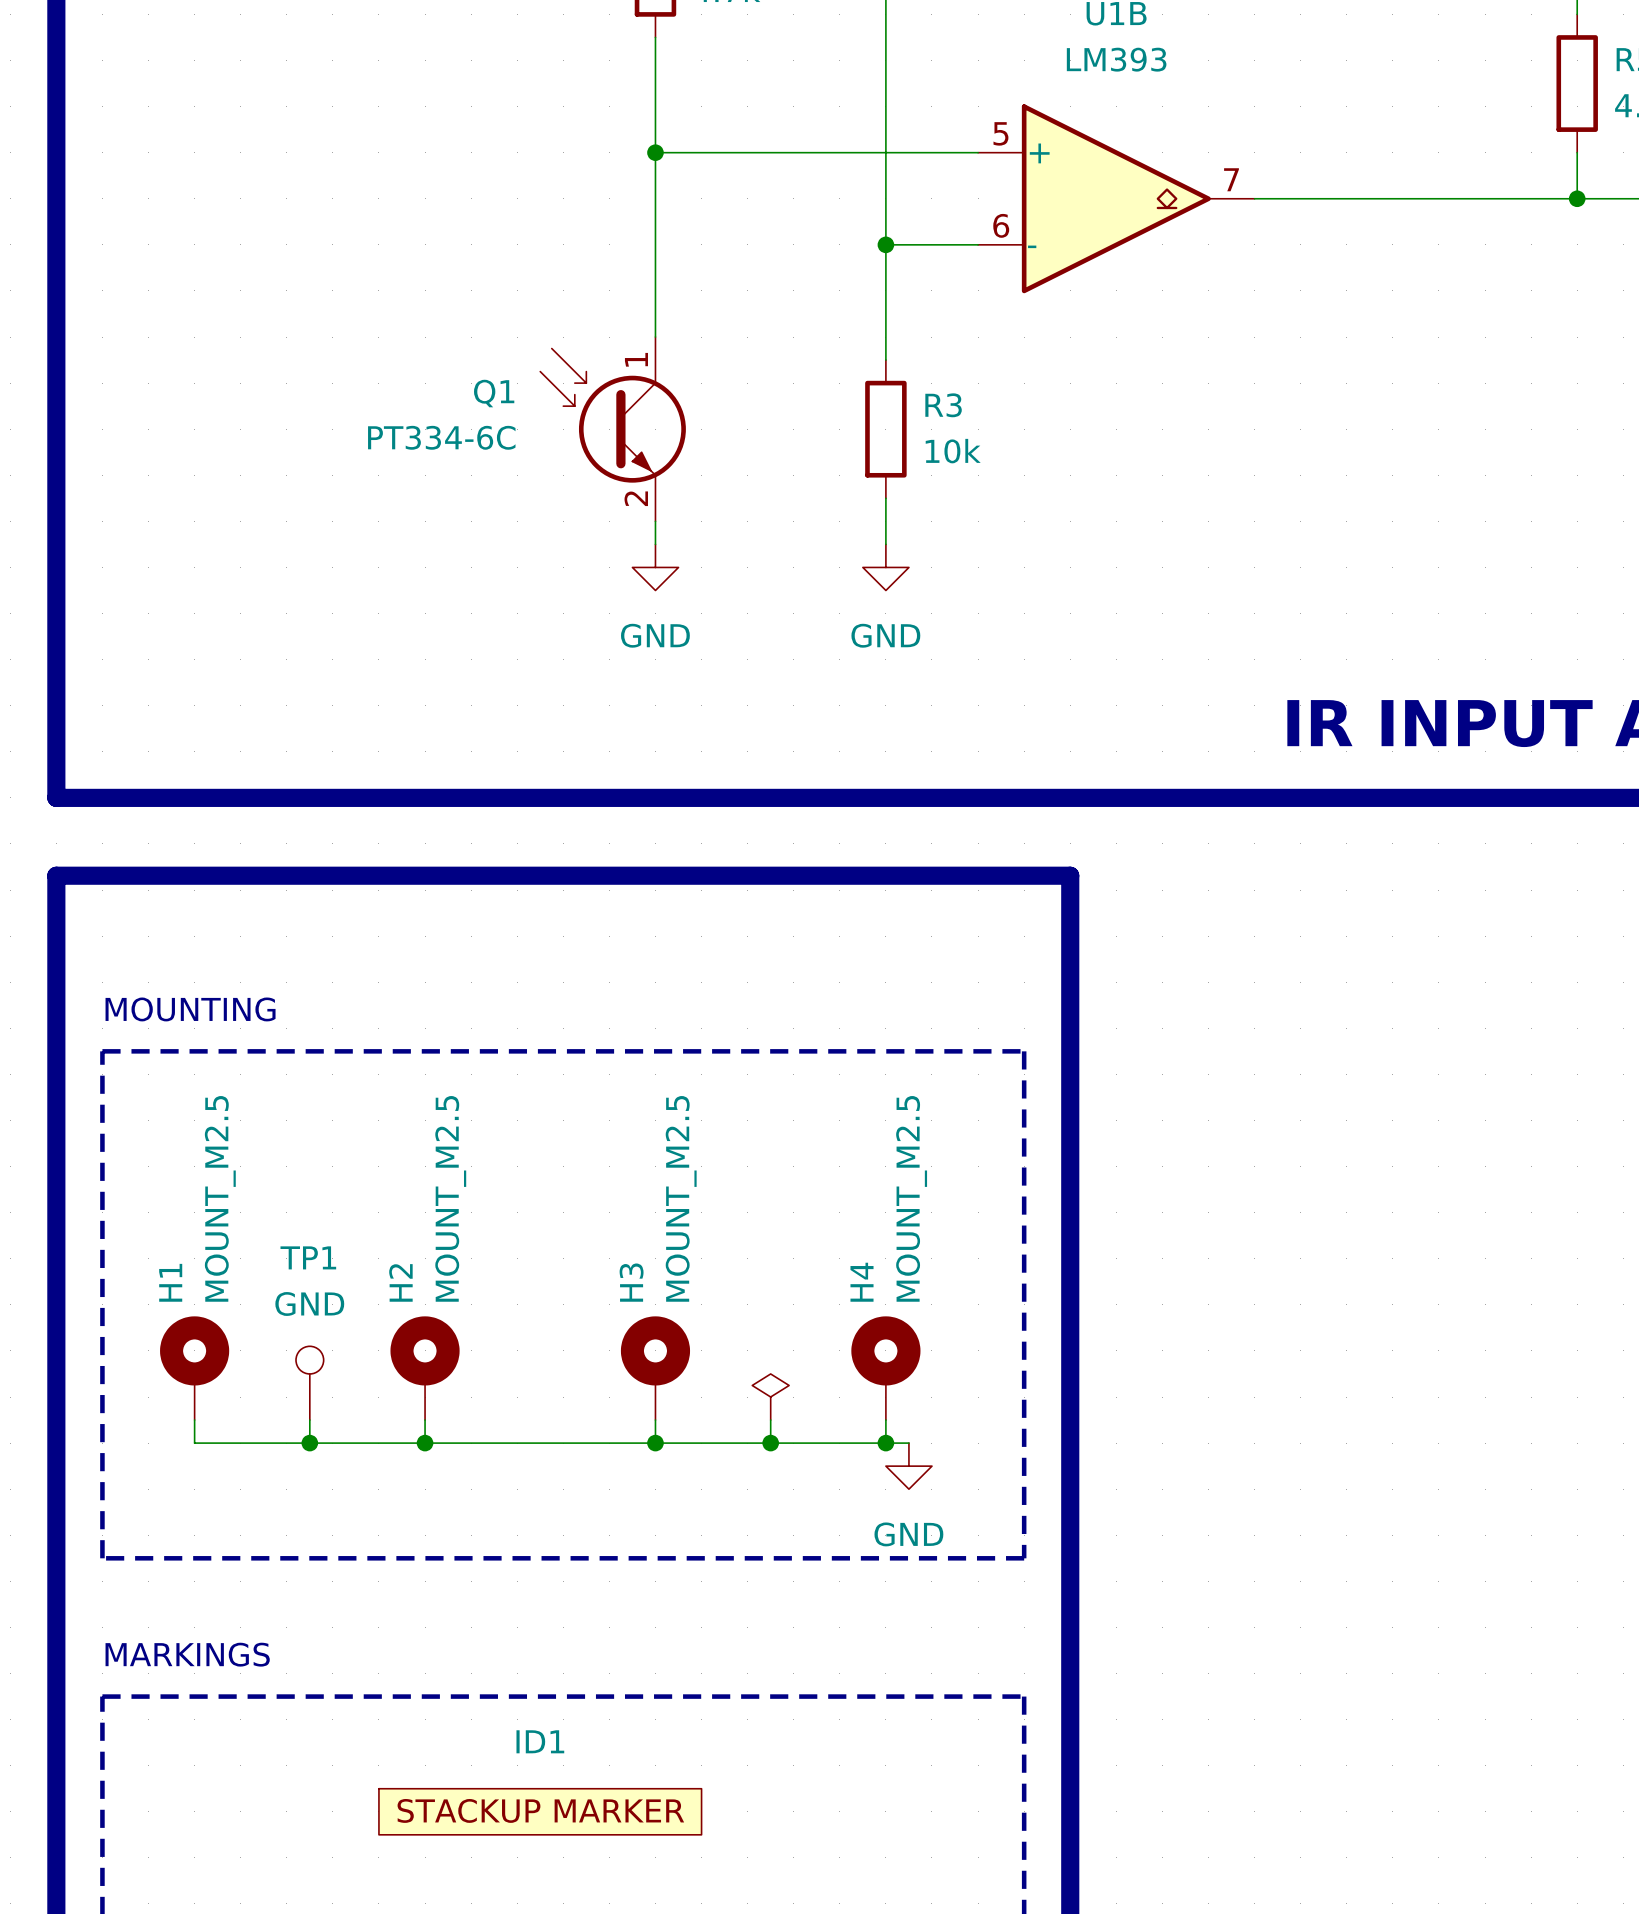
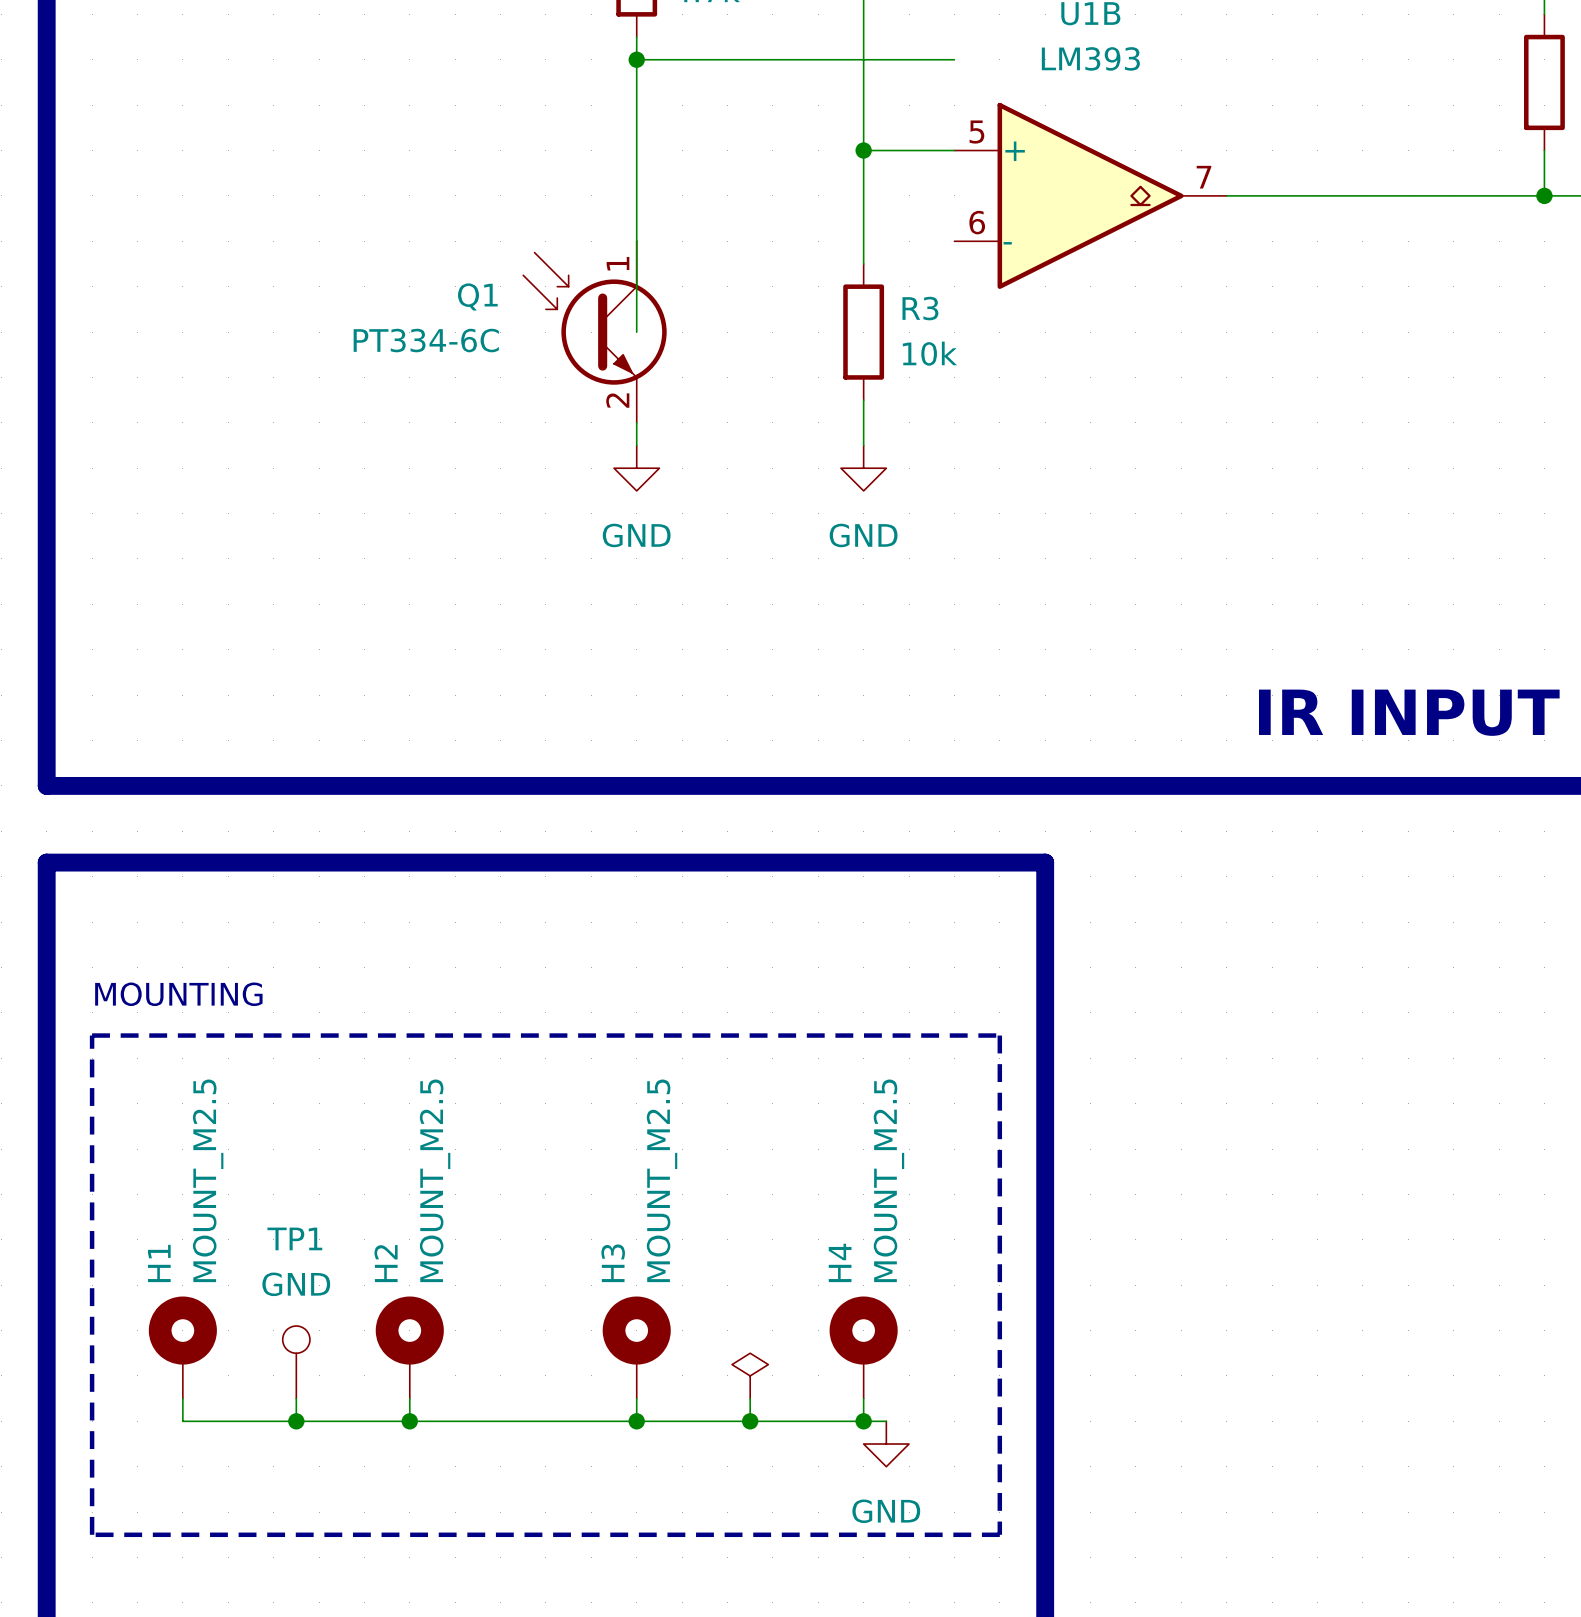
wire: none -> (636, 59) (954, 59)
wire: (655, 152) (885, 152) -> none
junction position: (655, 152) -> (636, 59)
wire: (885, 244) (978, 244) -> none
junction position: (885, 244) -> (863, 150)
wire: (885, 267) (885, 360) -> none
Q1 position: (613, 429) -> (594, 332)
R3 position: (885, 429) -> (863, 332)
wire: (885, 498) (885, 544) -> (863, 400) (863, 445)
wire: (655, 521) (655, 544) -> (636, 422) (636, 445)
power symbol position: GND (655, 567) -> GND (636, 468)
power symbol position: GND (885, 567) -> GND (863, 468)

